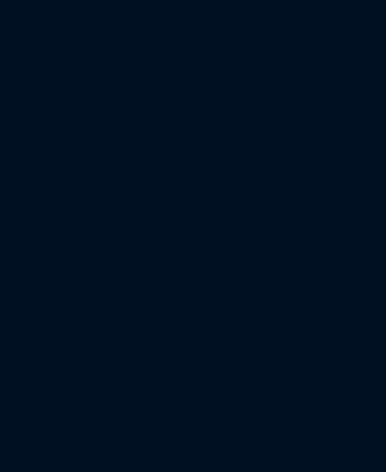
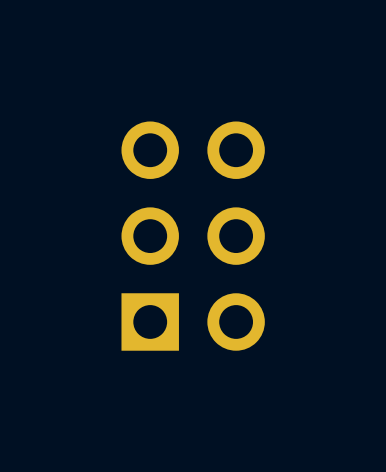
part: none -> (193, 236)

